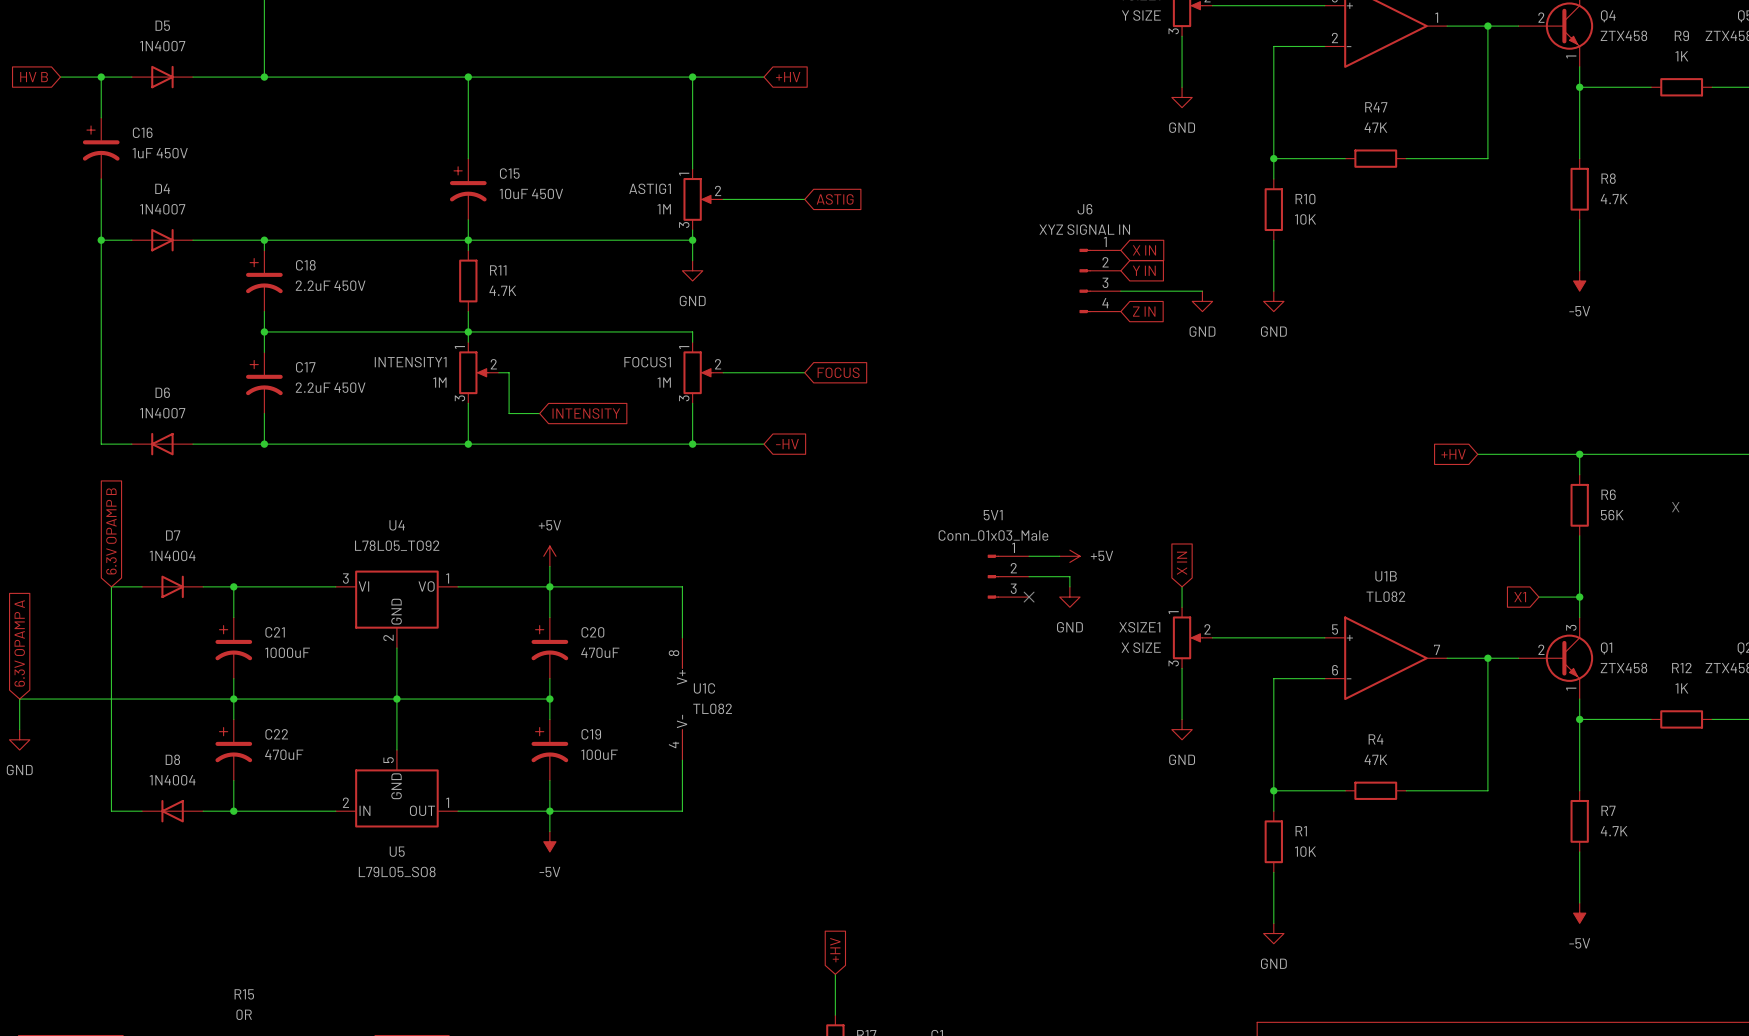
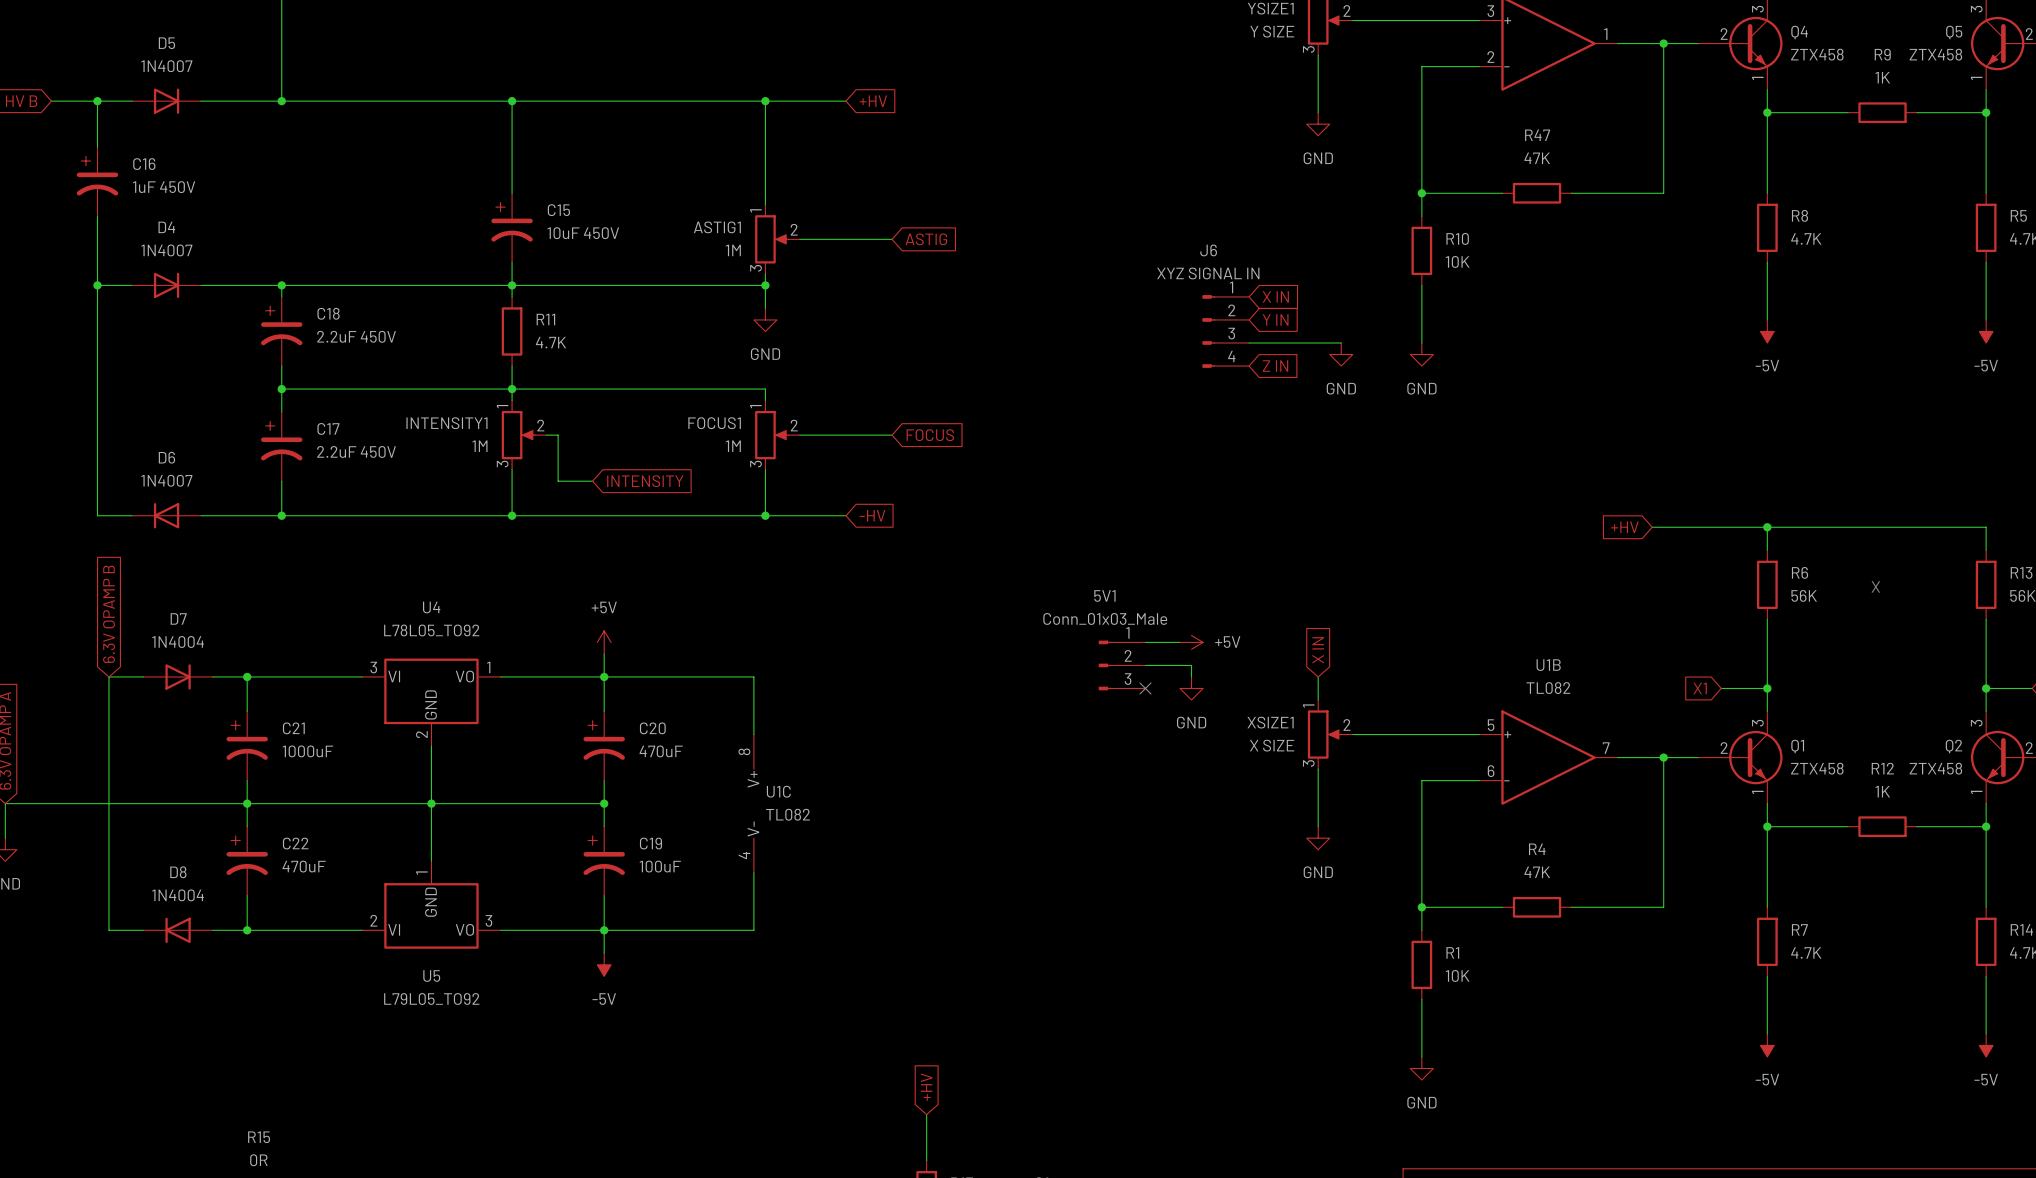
U5 pin number: 5 (388, 760) -> 1 (421, 873)
U5 pin number: 1 (447, 802) -> 3 (488, 920)
U5 pin name: IN (364, 810) -> VI (394, 929)
U5 pin name: OUT (422, 810) -> VO (464, 929)
U5 value: L79L05_SO8 (397, 871) -> L79L05_TO92 (431, 999)

